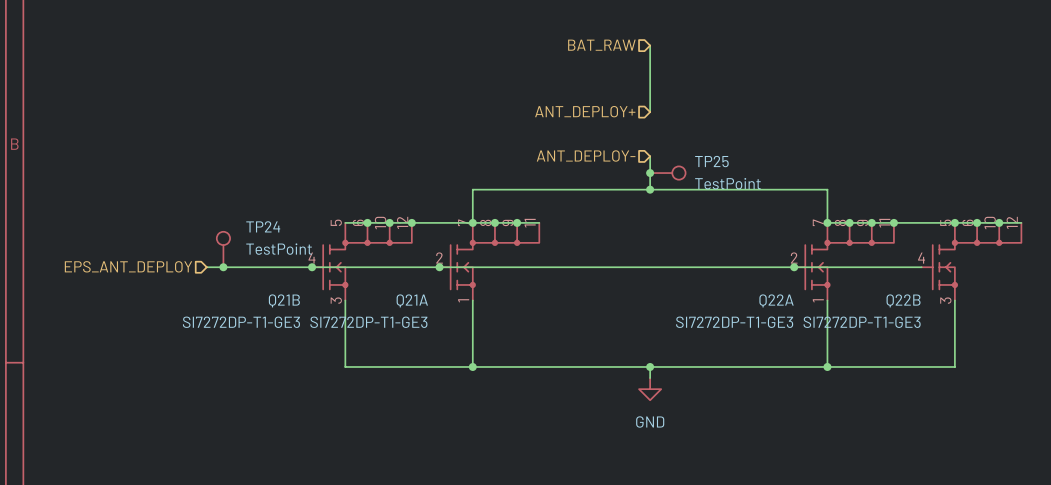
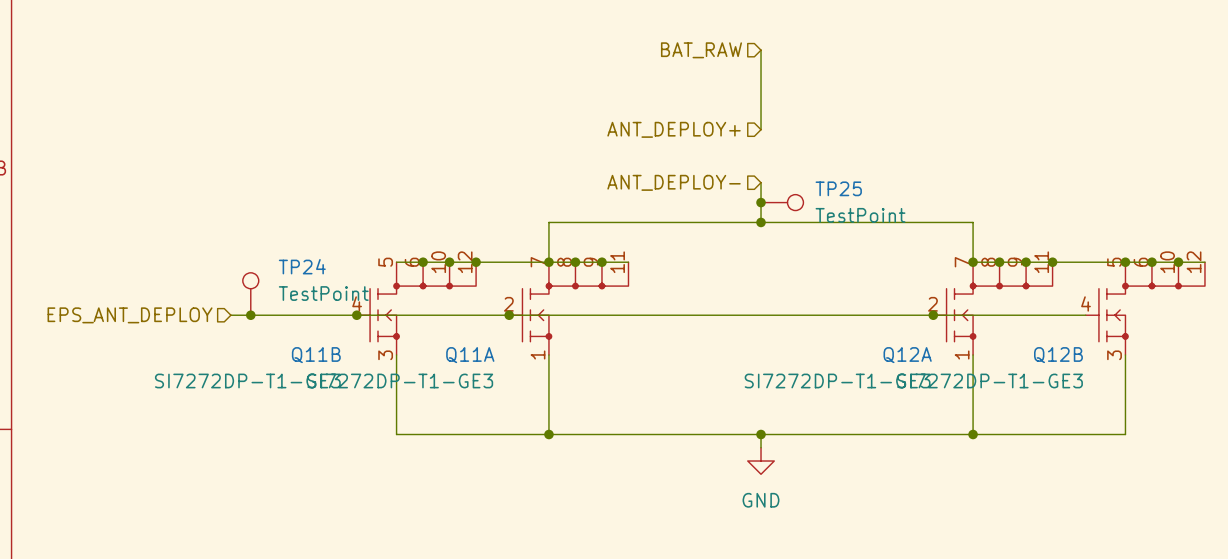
Q21B name: Q21B (284, 300) -> Q11B (316, 355)
Q21A name: Q21A (412, 300) -> Q11A (470, 355)
Q22A name: Q22A (776, 300) -> Q12A (907, 355)
Q22B name: Q22B (903, 300) -> Q12B (1058, 355)

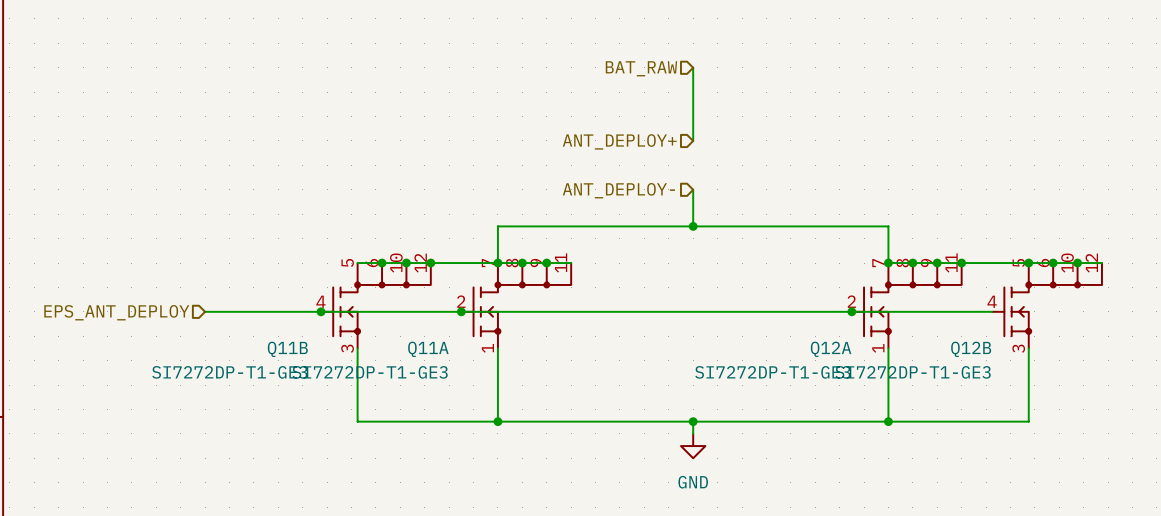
junction: (761, 202) -> none
TP25: TestPoint (782, 202) -> none
TP24: TestPoint (250, 294) -> none
junction: (250, 315) -> none

